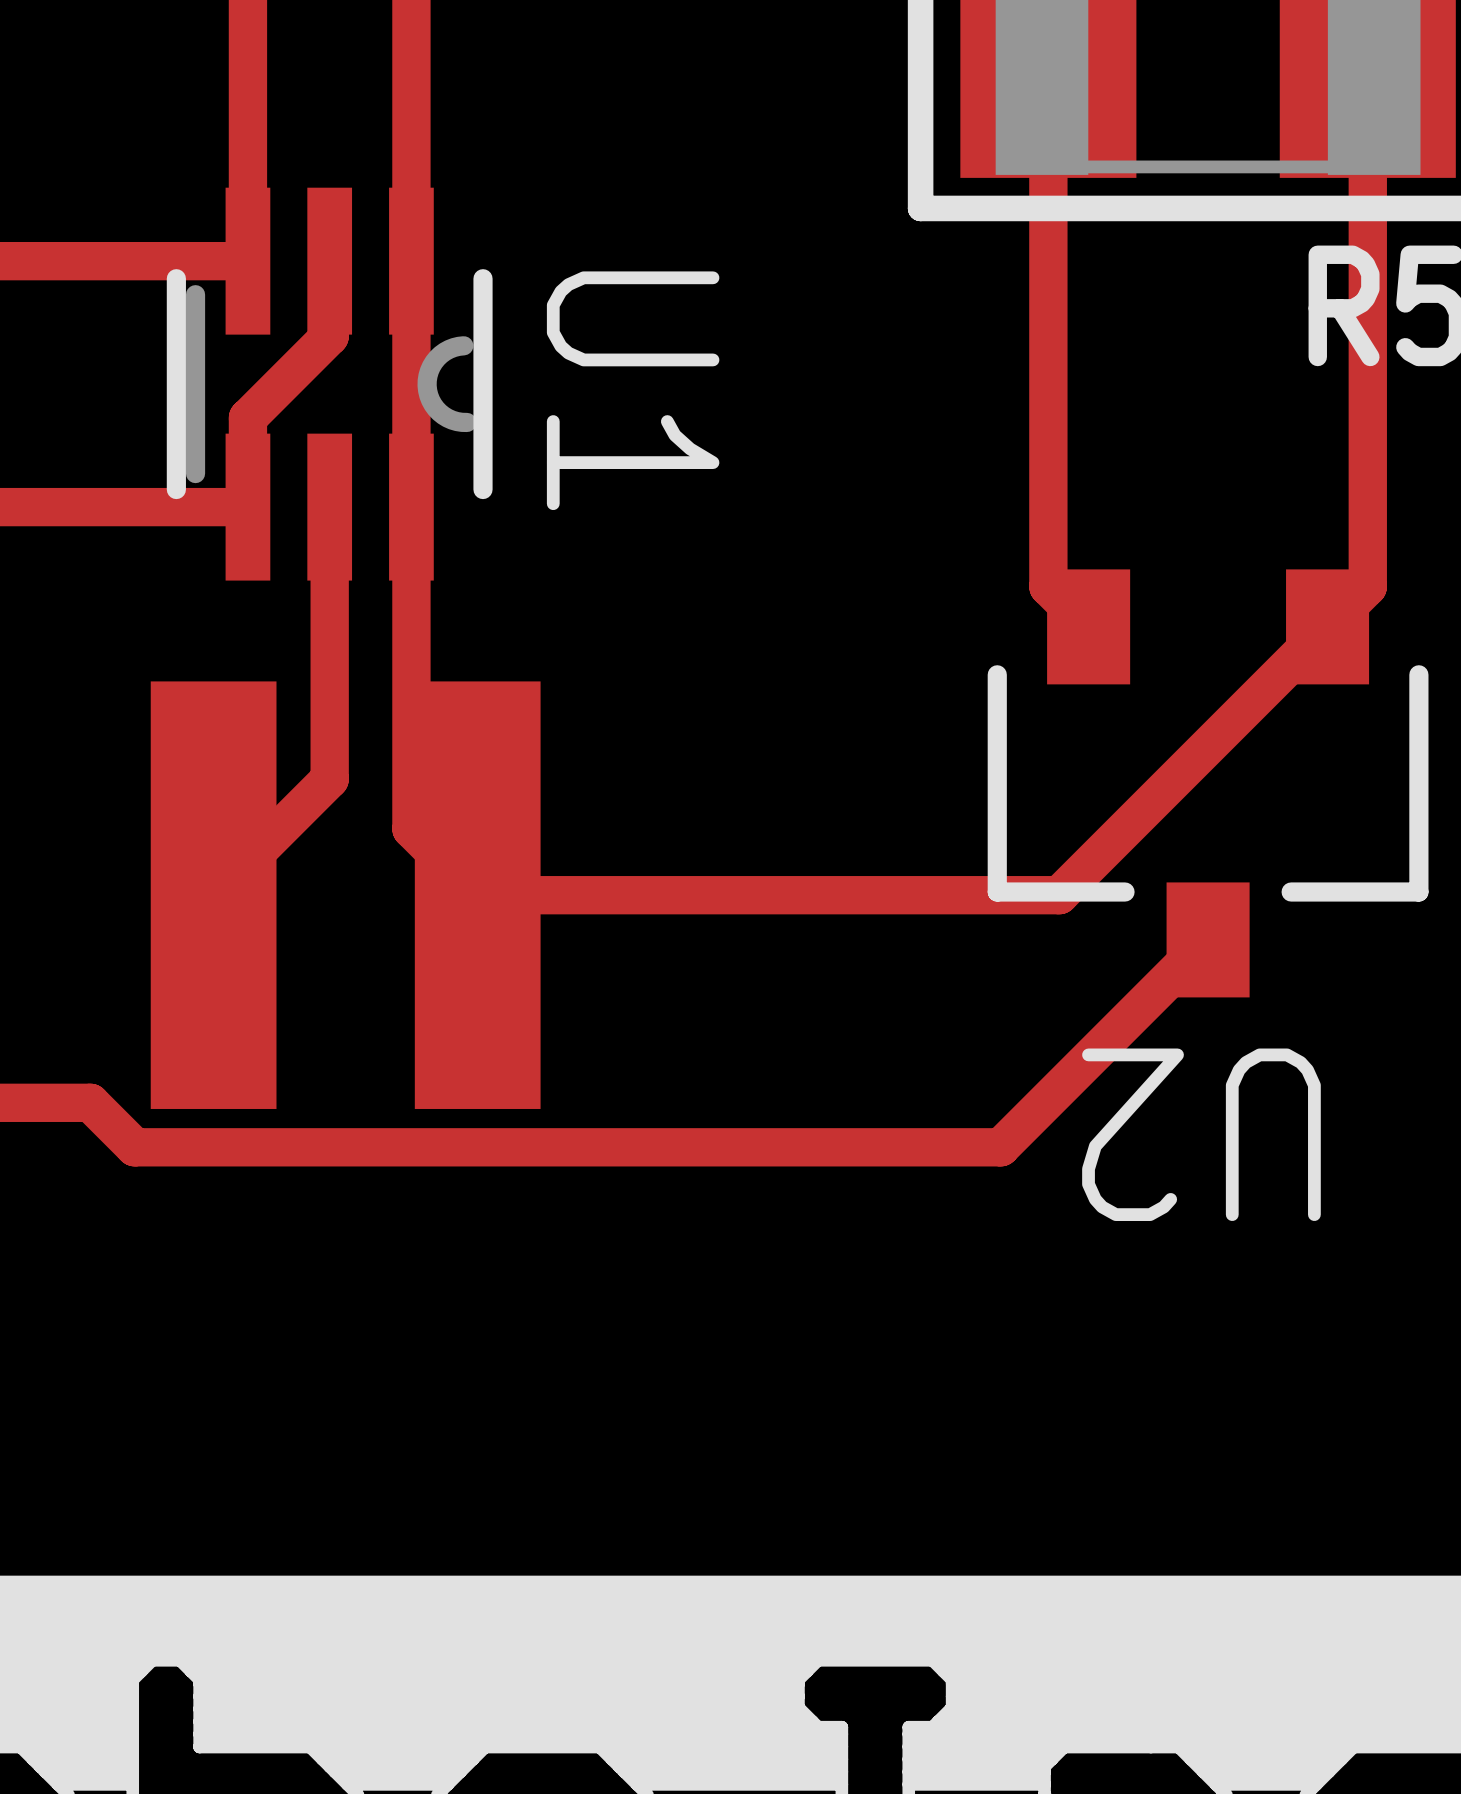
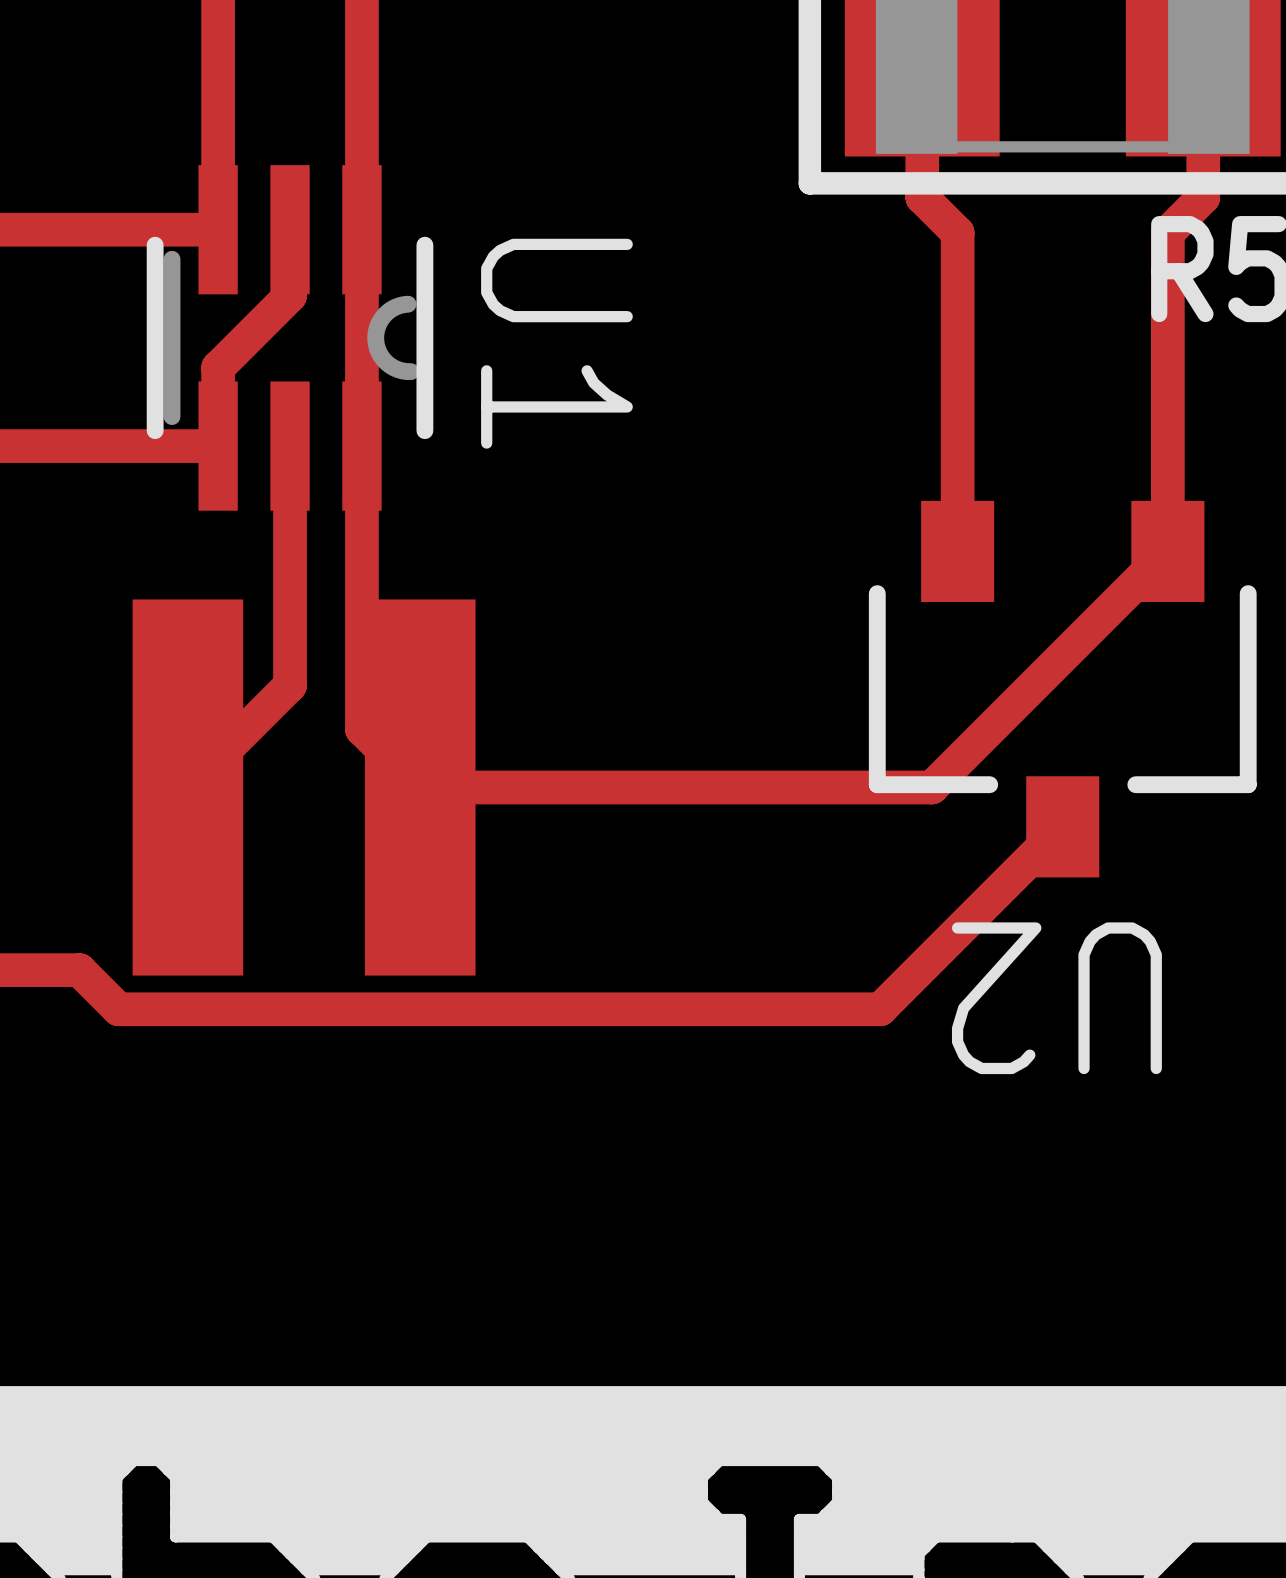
track: (1048, 224) (1048, 586) (1088, 626) -> (922, 197) (957, 232) (957, 551)
track: (1367, 224) (1367, 586) (1327, 626) -> (1203, 197) (1167, 232) (1167, 551)

